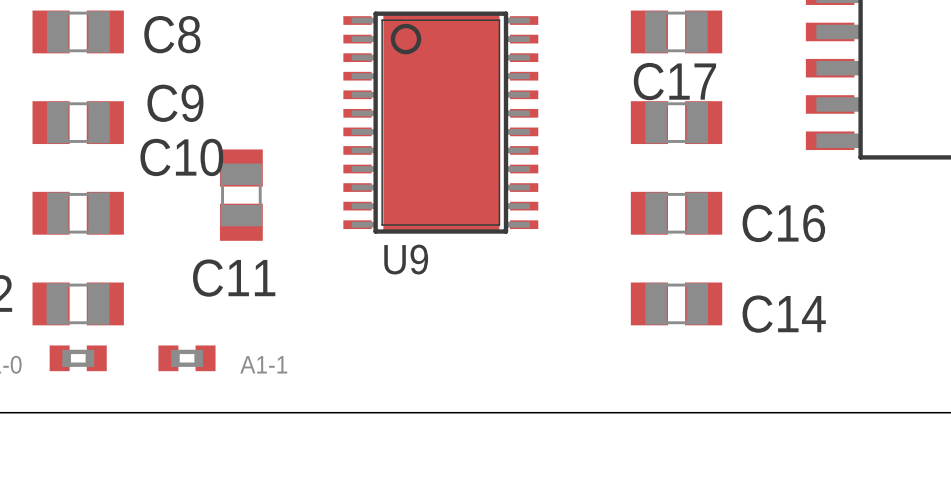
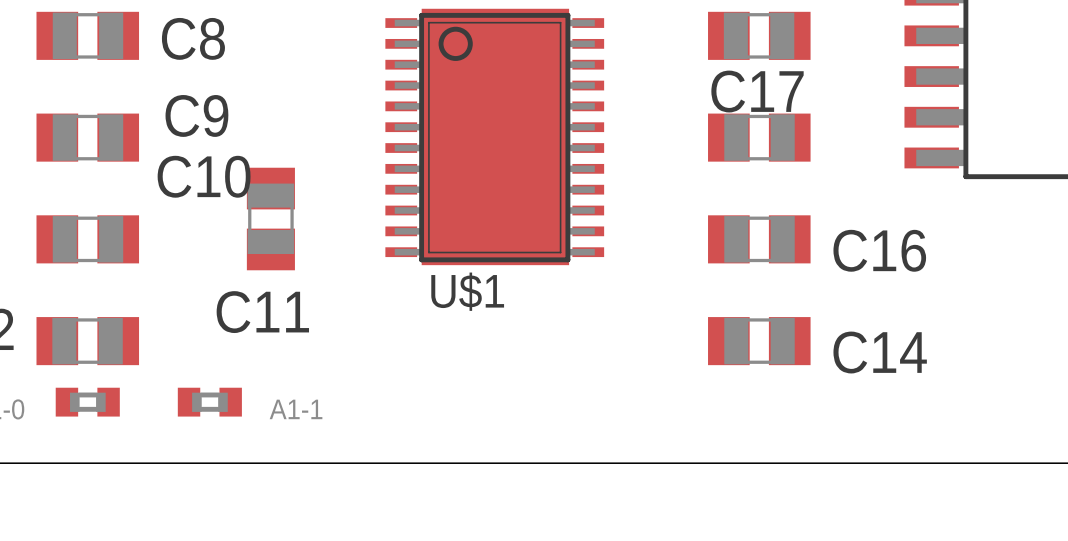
U9: (440, 122) -> none
U$1: none -> (494, 136)

